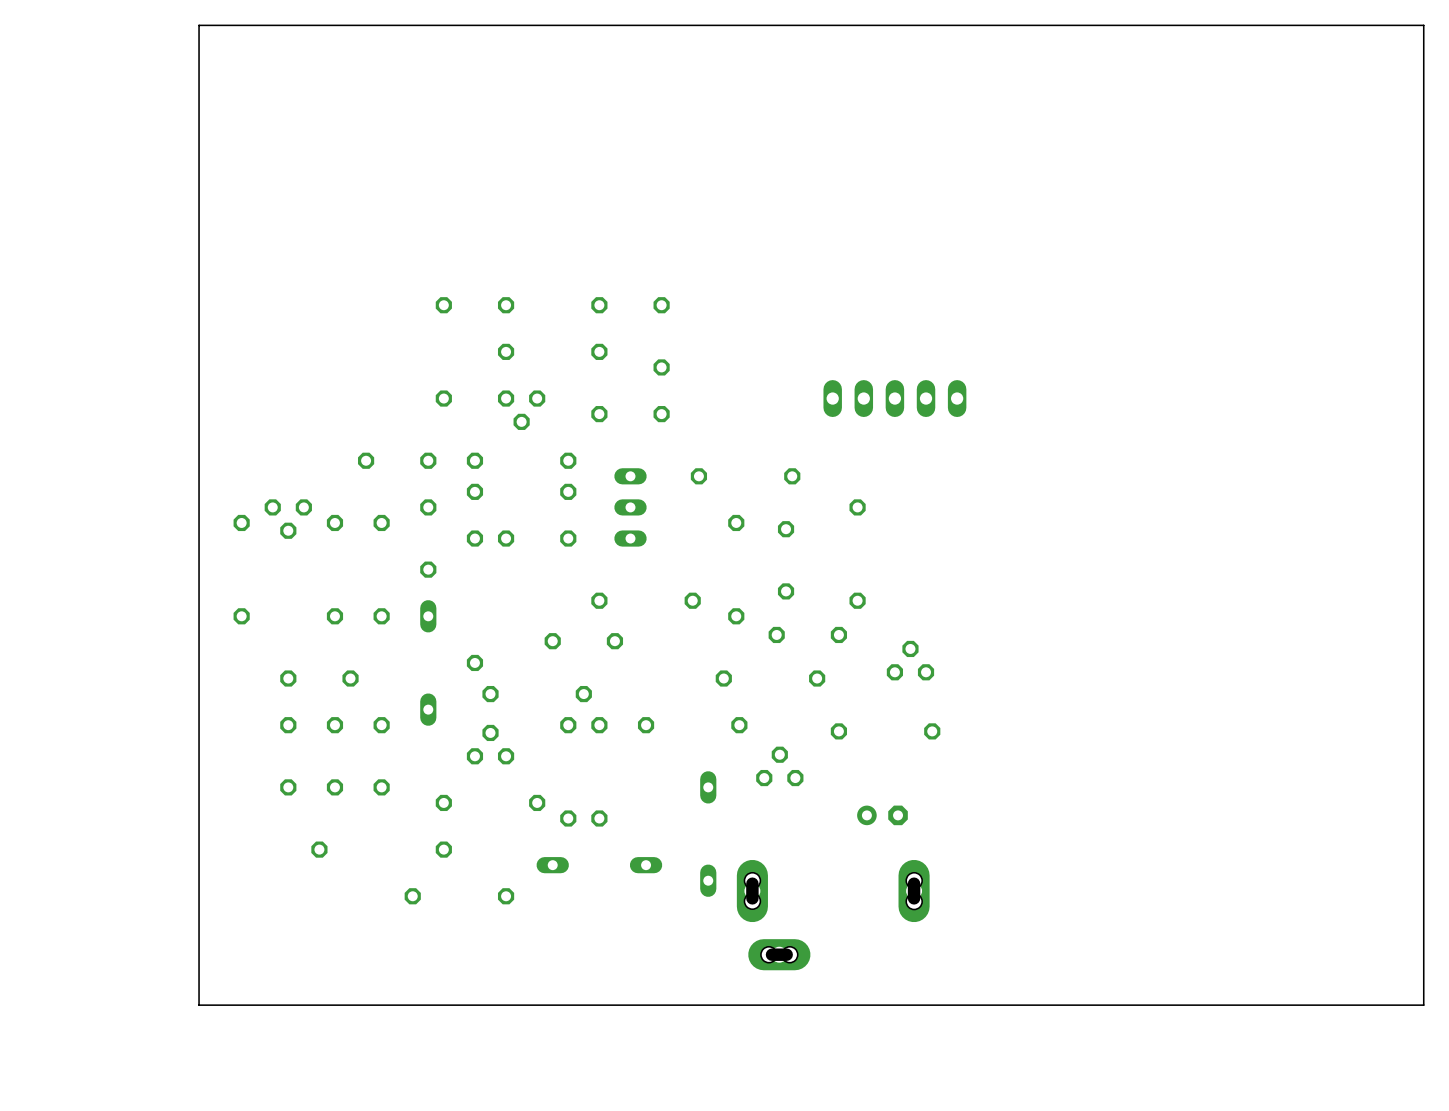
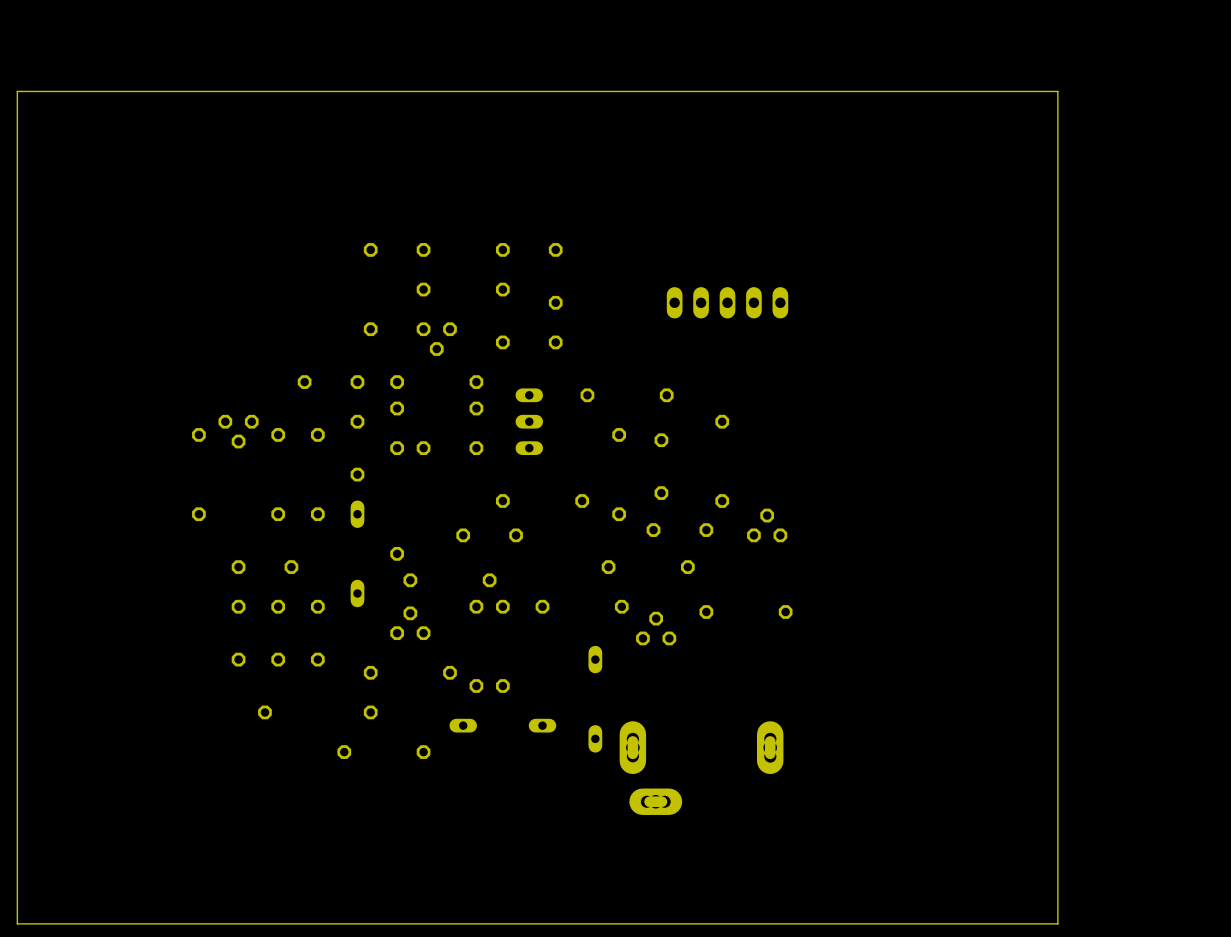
board edge: (1423, 25) (199, 25) (199, 1005) (1423, 1005) (1423, 25) -> (1057, 91) (17, 91) (17, 923) (1057, 923) (1057, 91)
part position: (894, 398) -> (727, 302)
part position: (910, 660) -> (767, 525)
part position: (779, 766) -> (656, 628)
part: (882, 815) -> none

